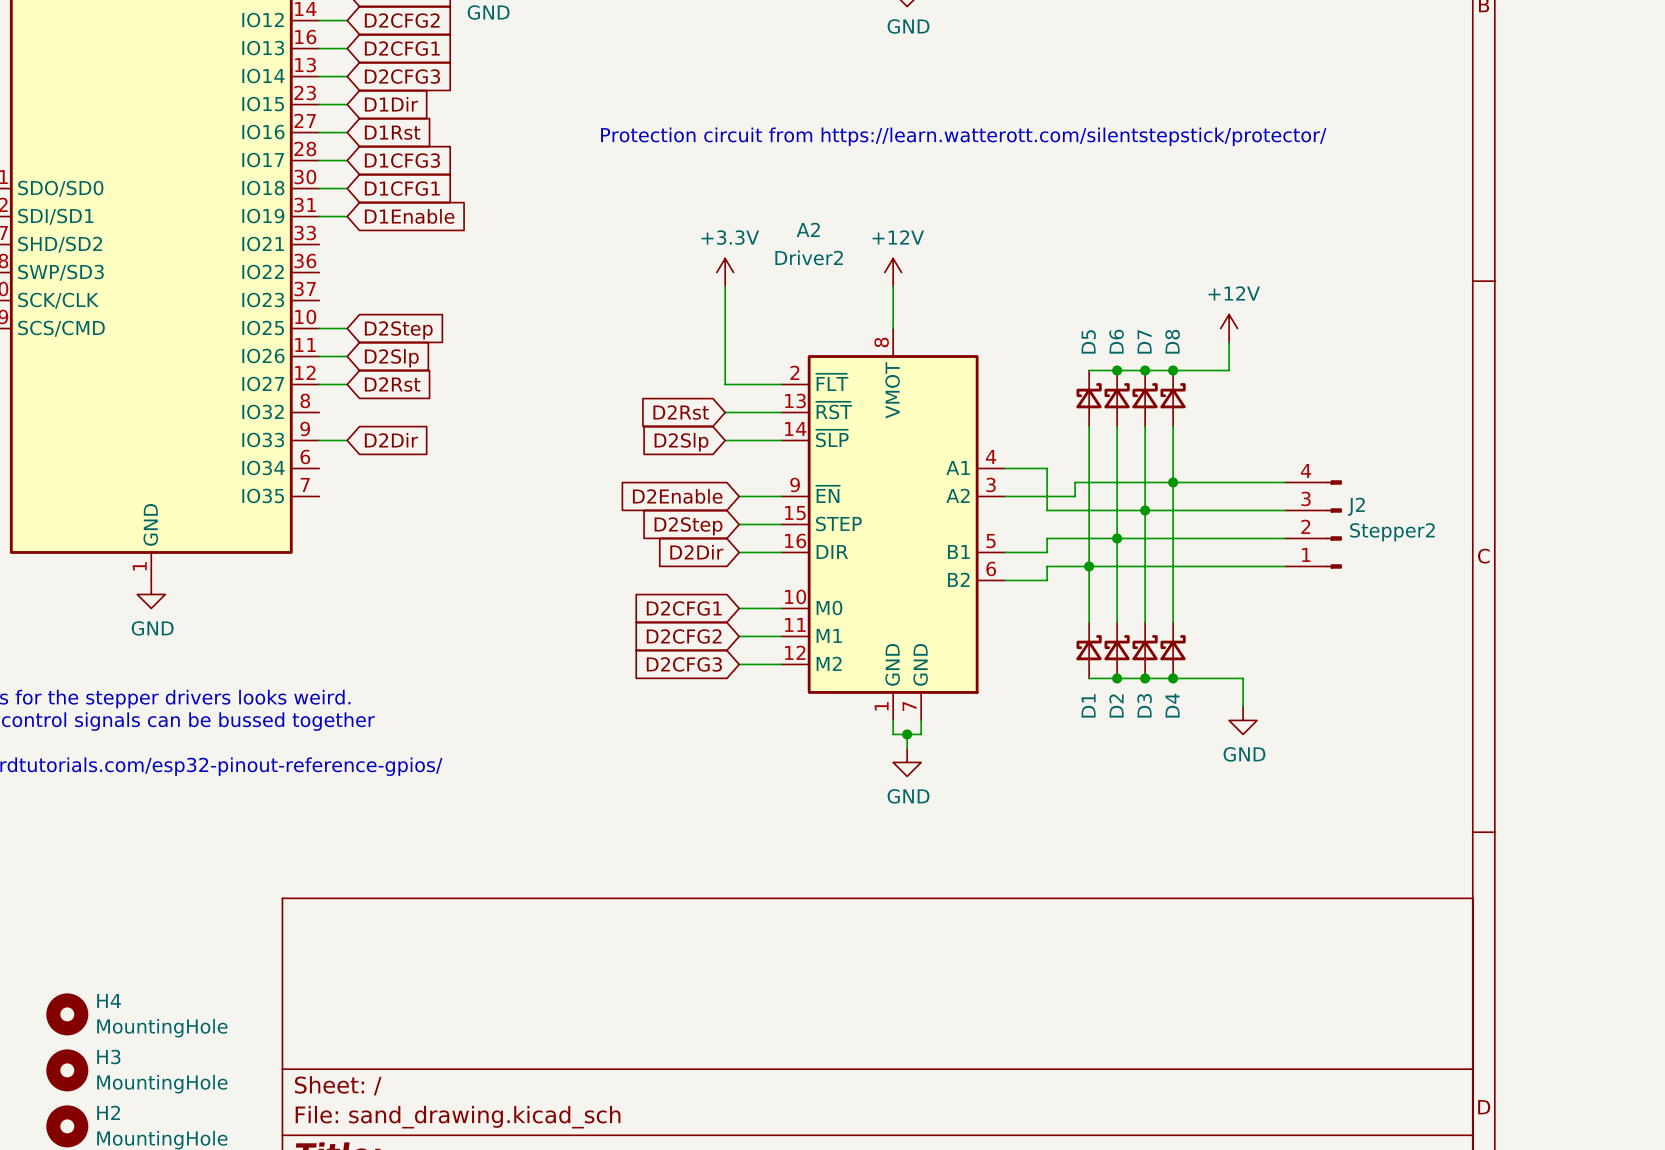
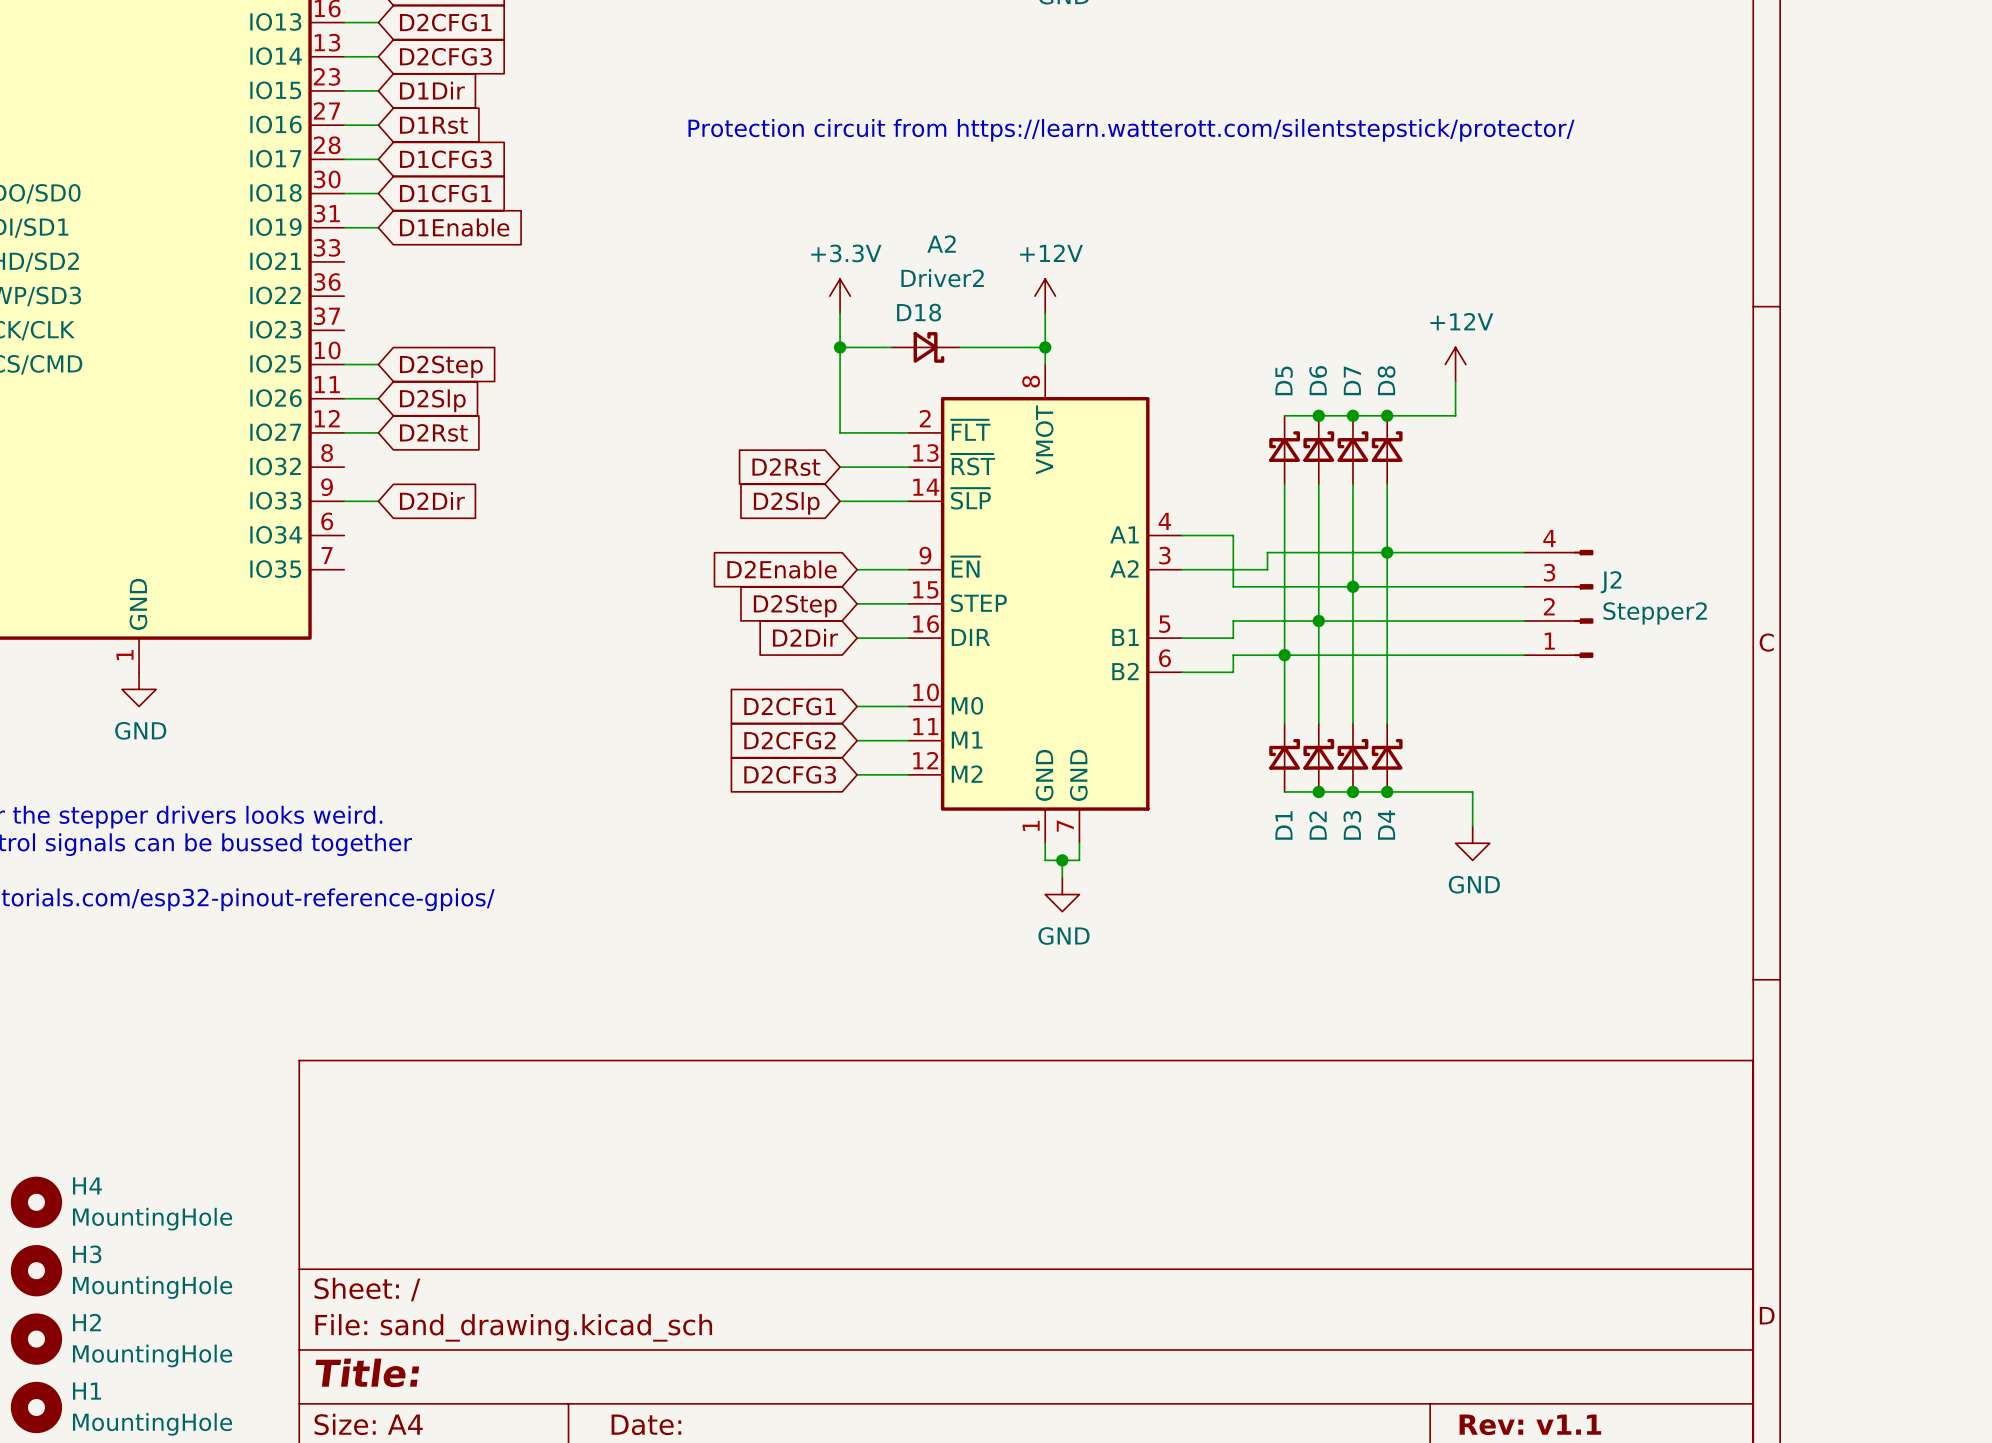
wire: none -> (840, 347) (891, 347)
junction: none -> (840, 347)
D18: none -> (925, 347)
wire: none -> (959, 347) (1045, 347)
junction: none -> (1045, 347)

